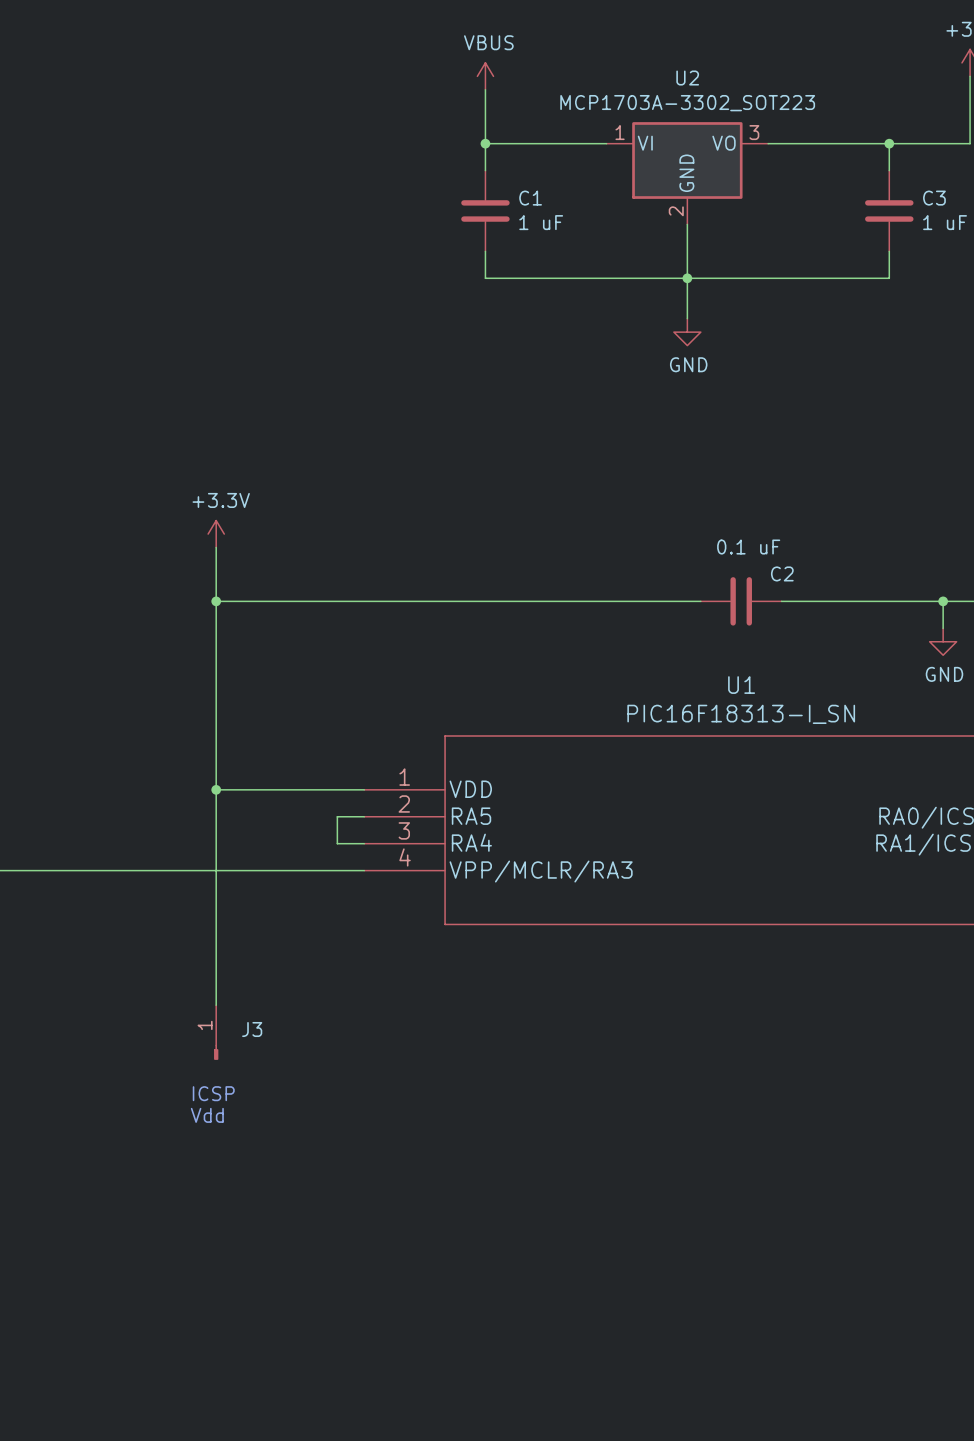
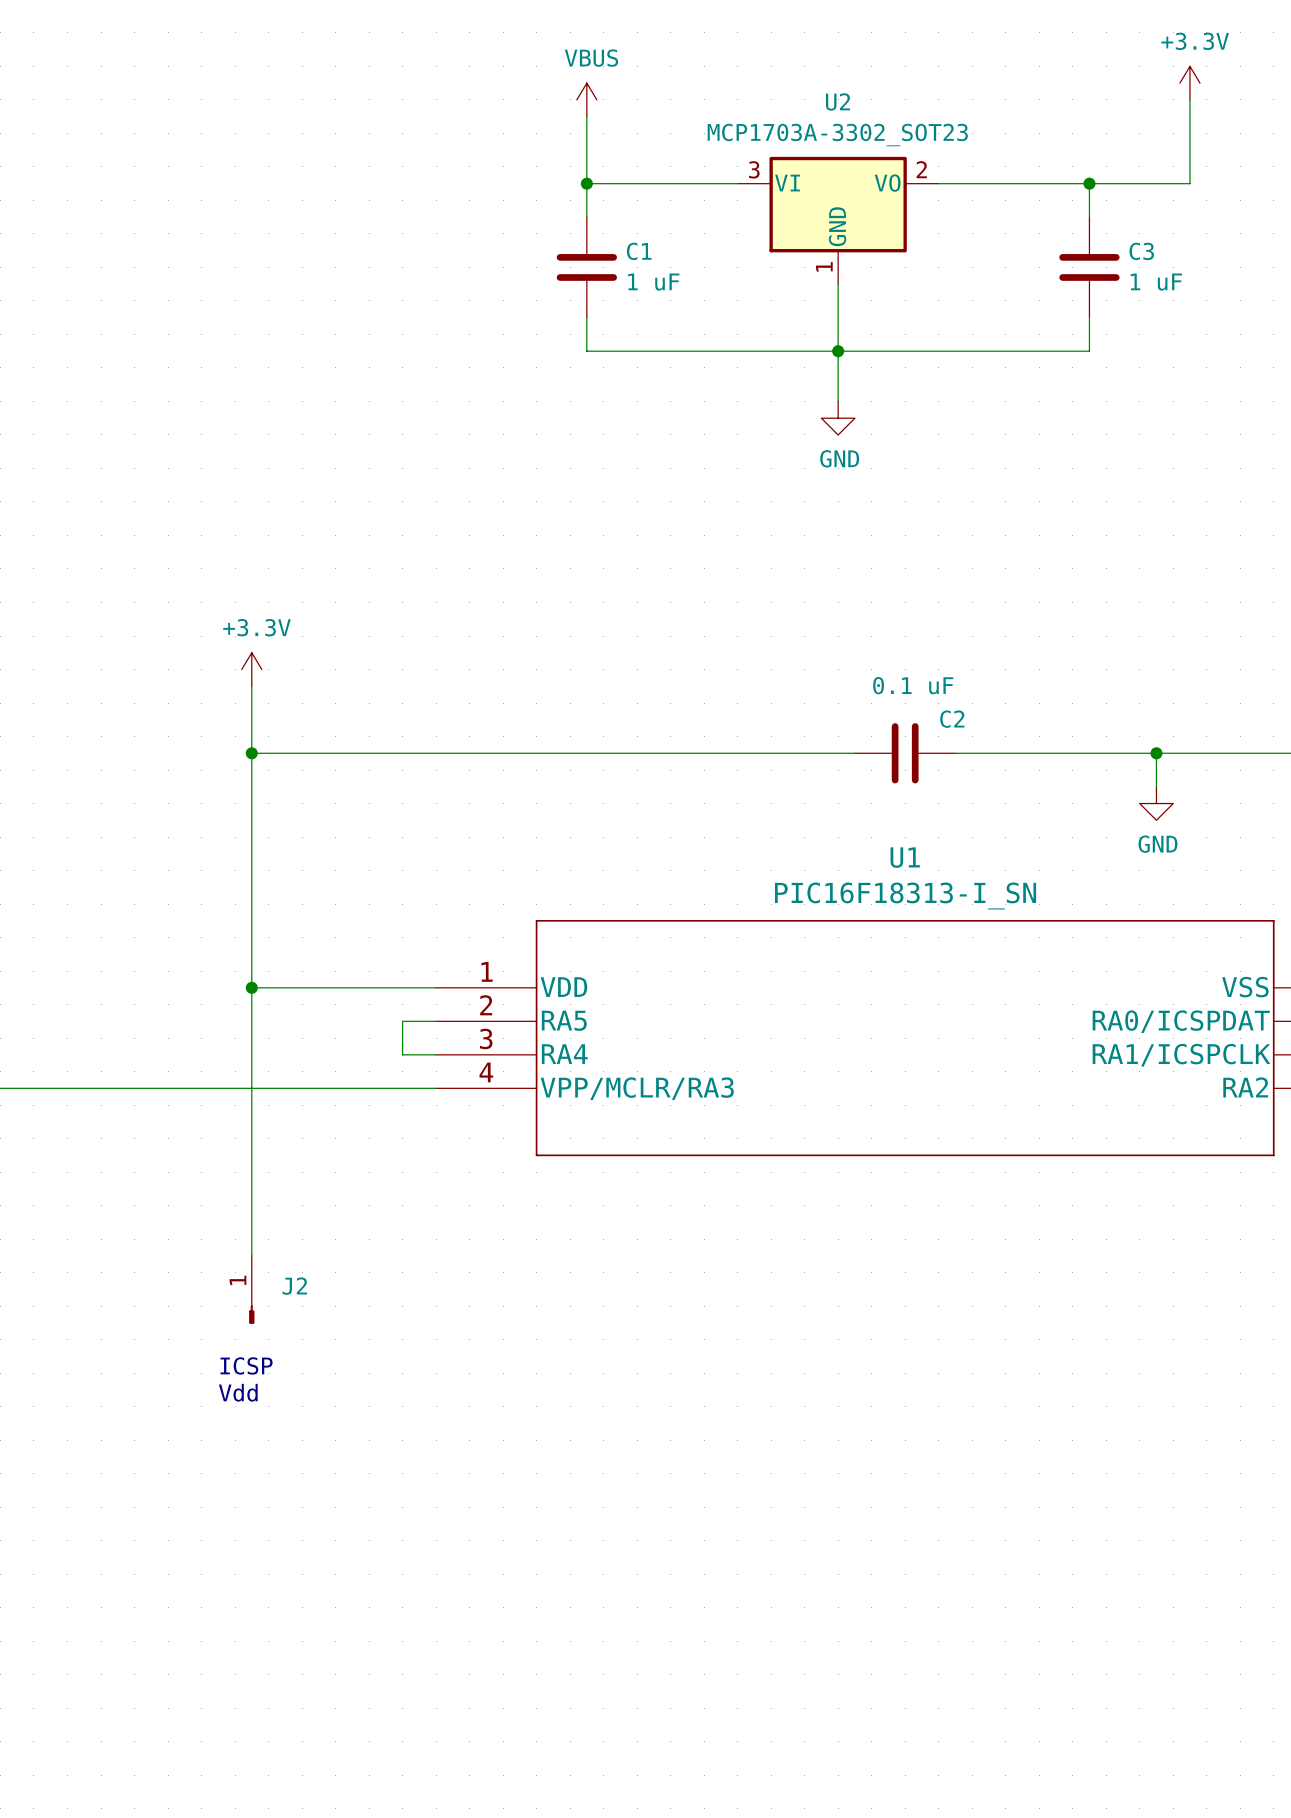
U2 value: MCP1703A-3302_SOT223 (687, 103) -> MCP1703A-3302_SOT23 (837, 135)
U2 pin number: 1 (620, 132) -> 3 (754, 169)
U2 pin number: 3 (754, 132) -> 2 (921, 169)
U2 pin number: 2 (676, 211) -> 1 (824, 266)
J3 name: J3 (252, 1029) -> J2 (294, 1286)

